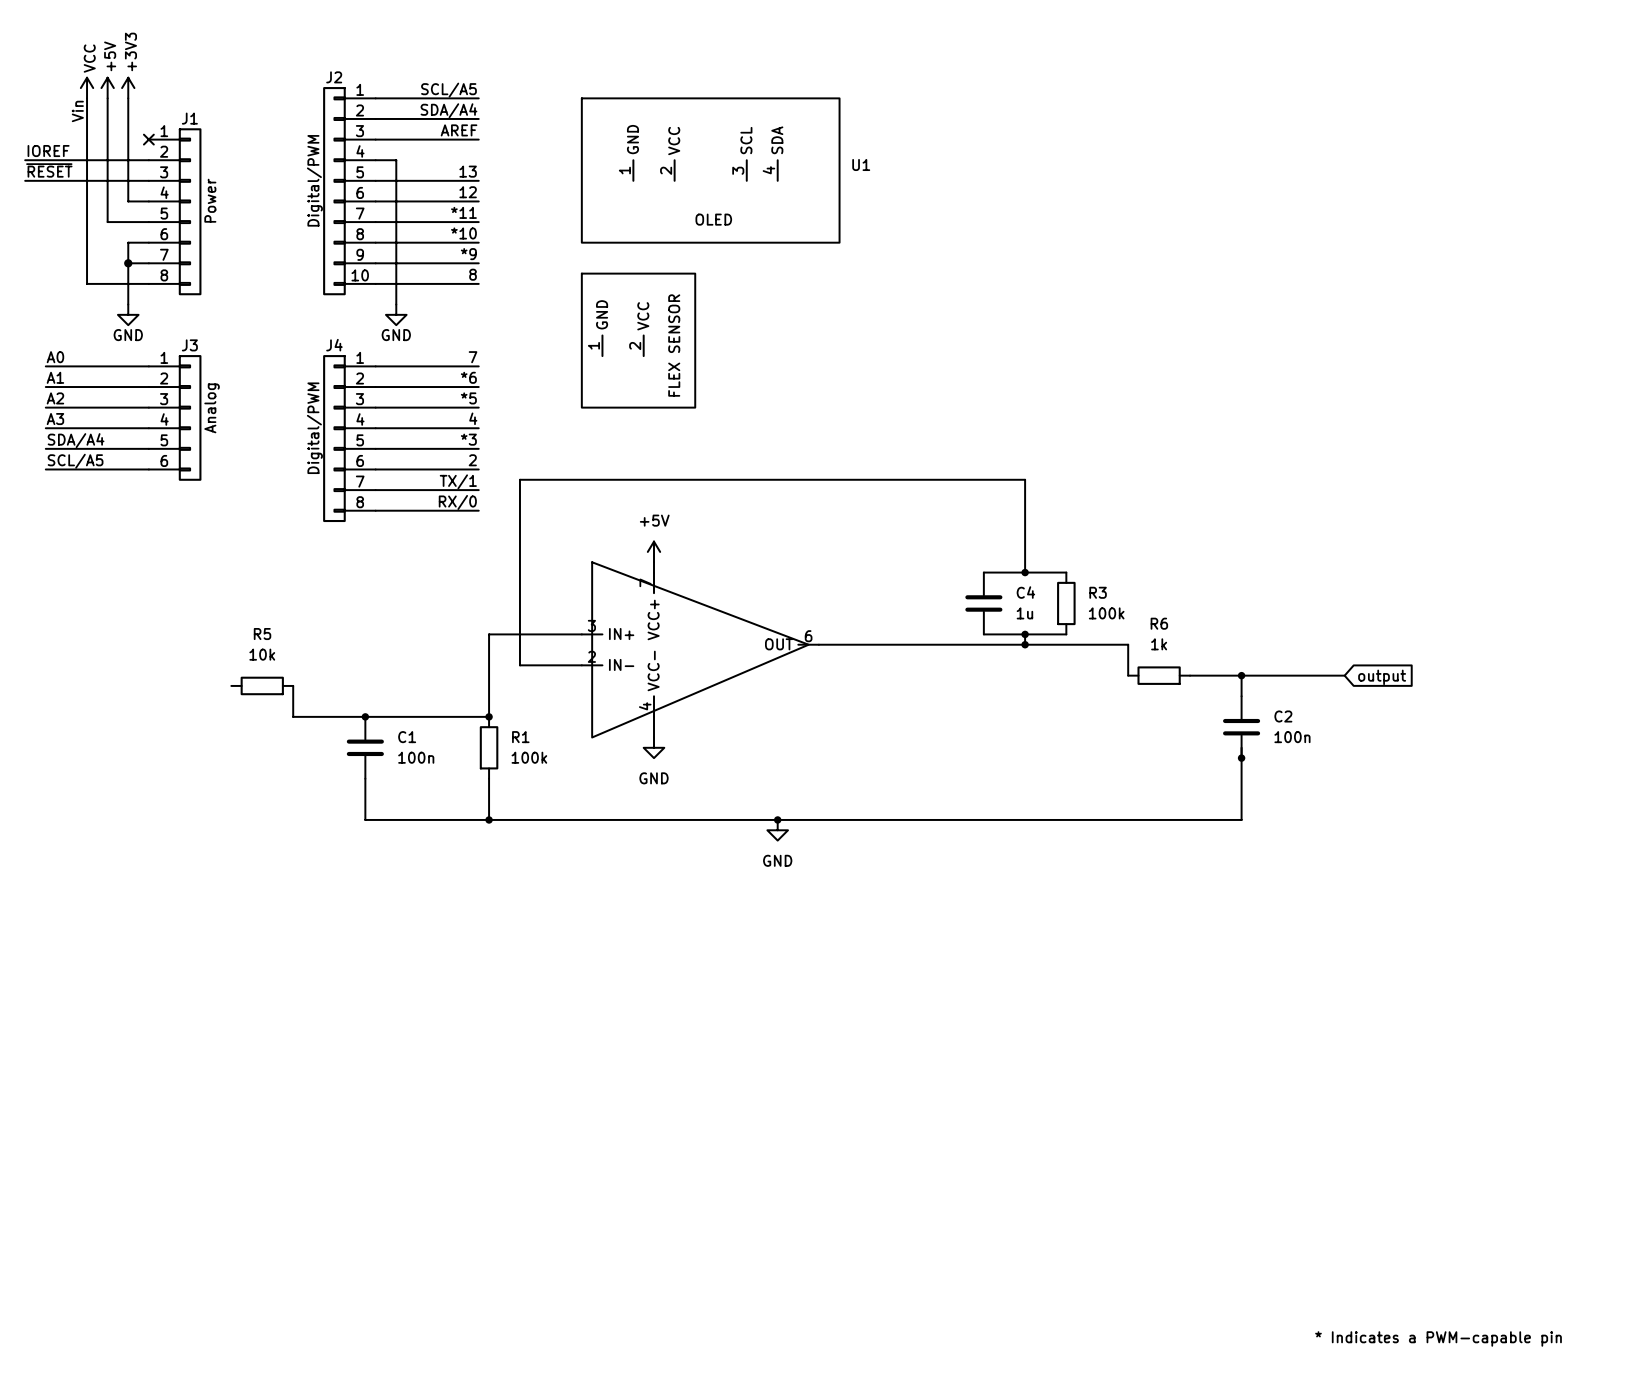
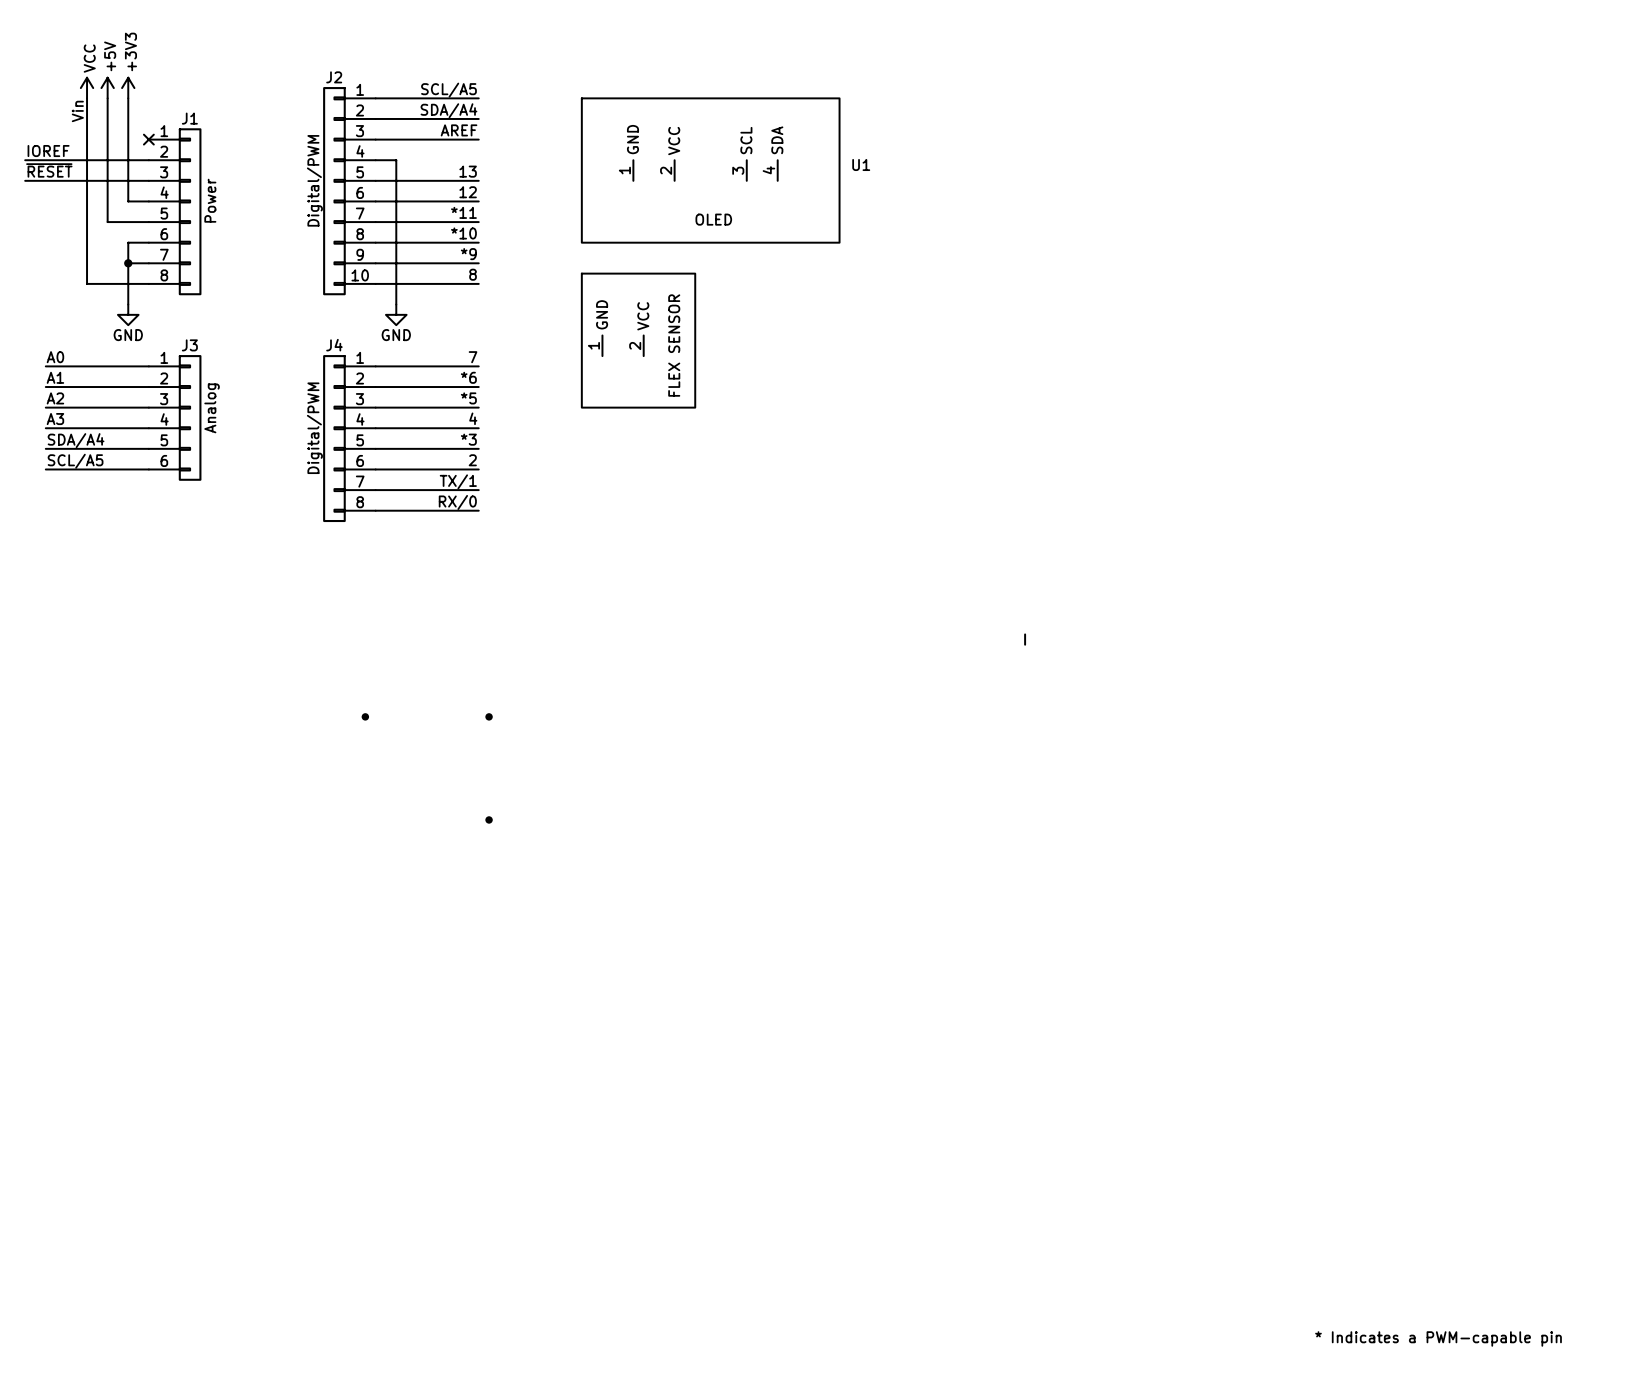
power symbol: +5V (654, 551) -> none
wire: (654, 562) (654, 572) -> none
wire: (983, 572) (1066, 572) -> none
wire: (1025, 572) (1025, 479) (519, 479) (519, 665) (581, 665) -> none
junction: (1025, 572) -> none
C4: 1u (983, 603) -> none
R3: 100k (1066, 603) -> none
wire: (581, 634) (489, 634) (489, 716) (293, 716) (293, 685) -> none
wire: (983, 634) (1066, 634) -> none
junction: (1025, 634) -> none
wire: (818, 644) (1128, 644) (1128, 675) -> none
junction: (1025, 644) -> none
part: (700, 649) -> none
R6: 1k (1159, 675) -> none
wire: (1190, 675) (1344, 675) -> none
wire: (1241, 675) (1241, 696) -> none
junction: (1241, 675) -> none
global label: output (1382, 677) -> none
R5: 10k (262, 685) -> none
wire: (654, 716) (654, 737) -> none
C2: 100n (1241, 727) -> none
C1: 100n (365, 747) -> none
R1: 100k (489, 747) -> none
power symbol: GND (654, 747) -> none
wire: (1241, 747) (1241, 819) (365, 819) (365, 778) -> none
junction: (1241, 758) -> none
wire: (489, 778) (489, 819) -> none
junction: (777, 819) -> none
power symbol: GND (777, 830) -> none

